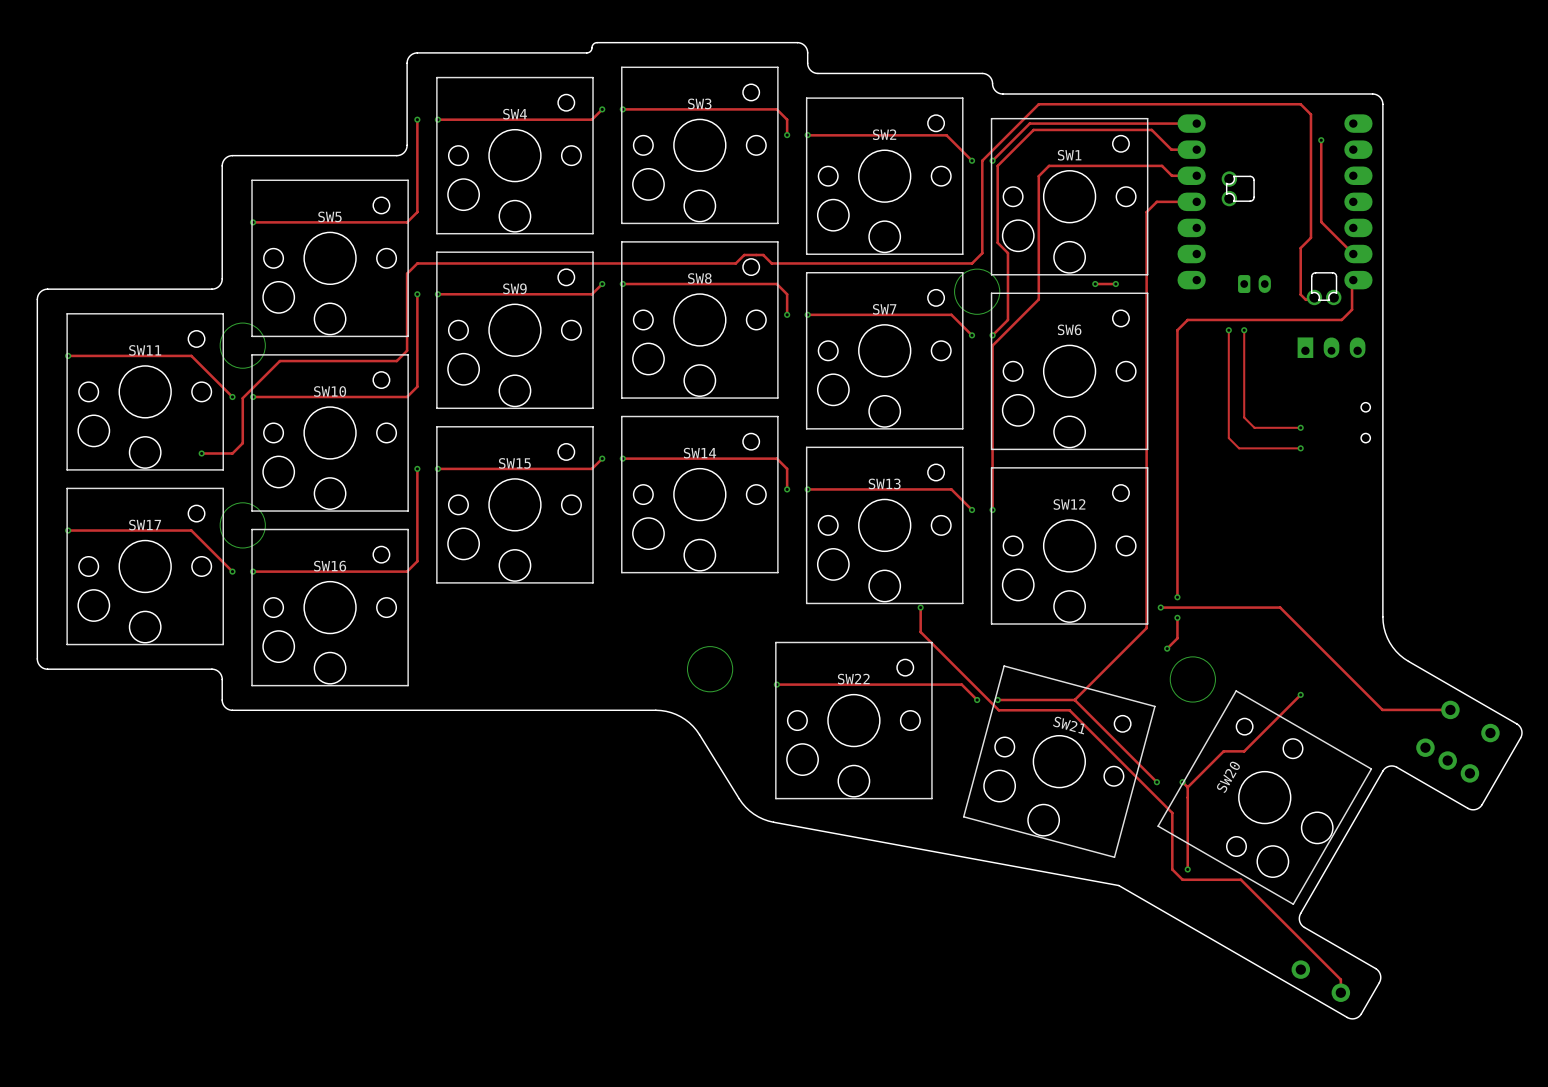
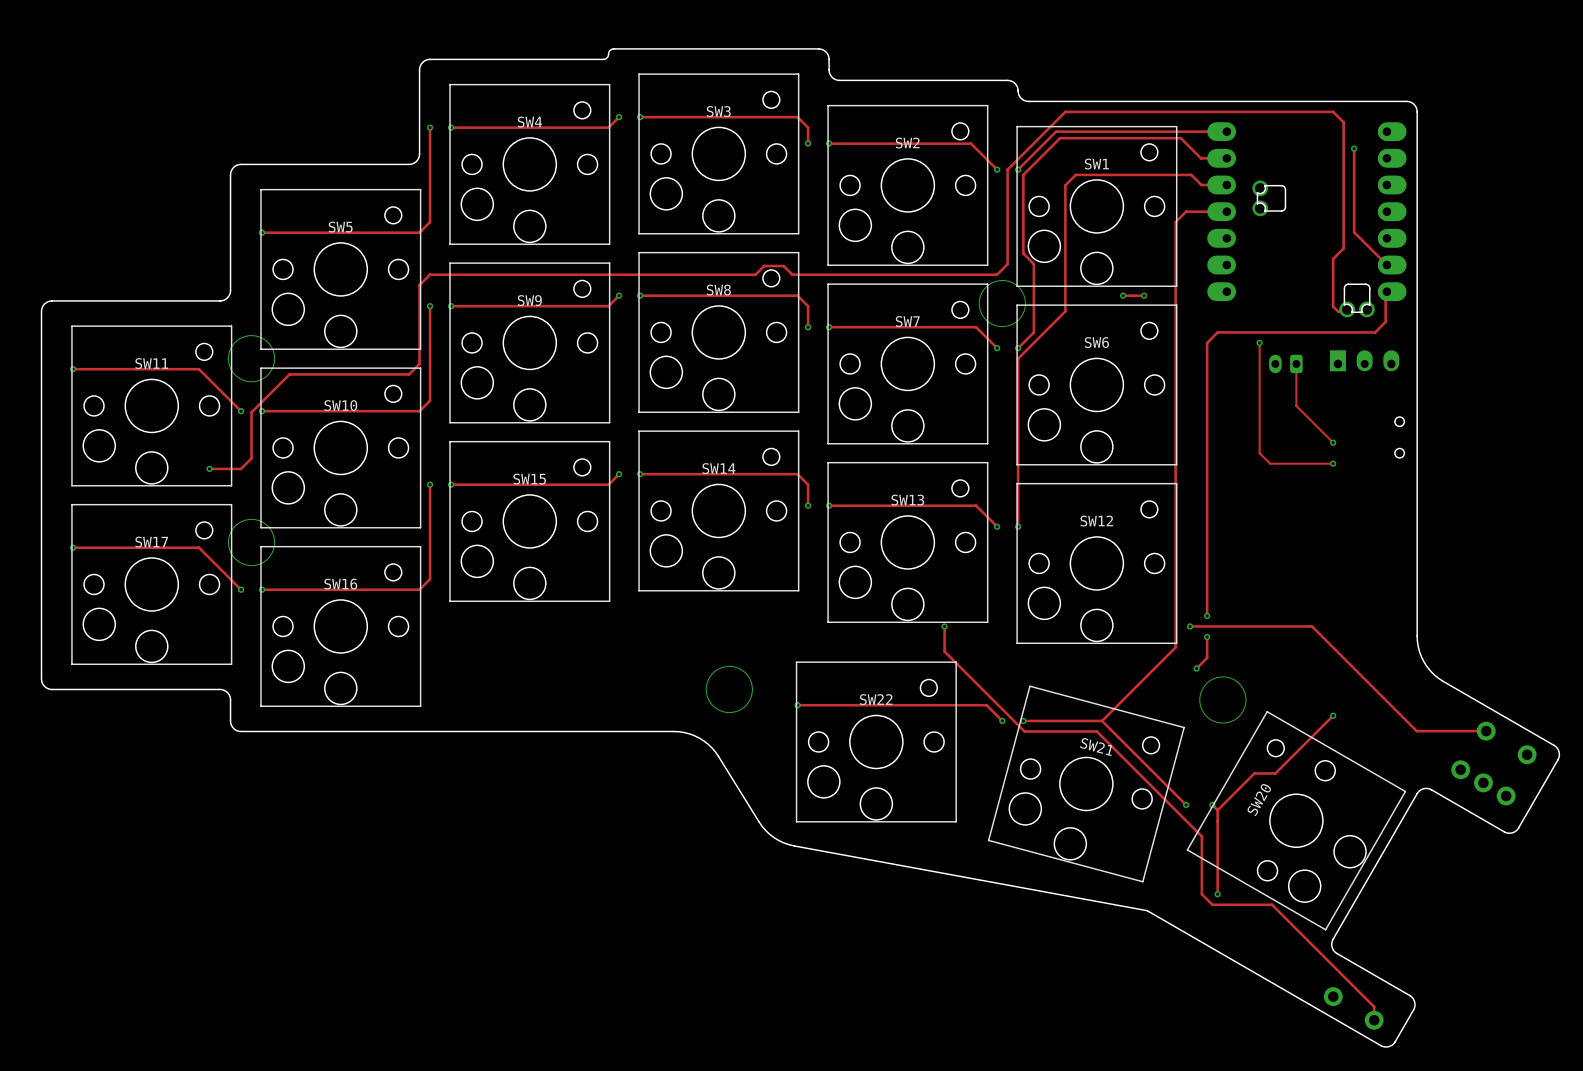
part rotation: 0° (1254, 284) -> 180° (1285, 363)
part position: (1254, 284) -> (1285, 363)
track: (1244, 330) (1244, 417) (1254, 427) (1300, 427) -> (1296, 363) (1296, 405) (1333, 442)
via: (1244, 330) -> none

